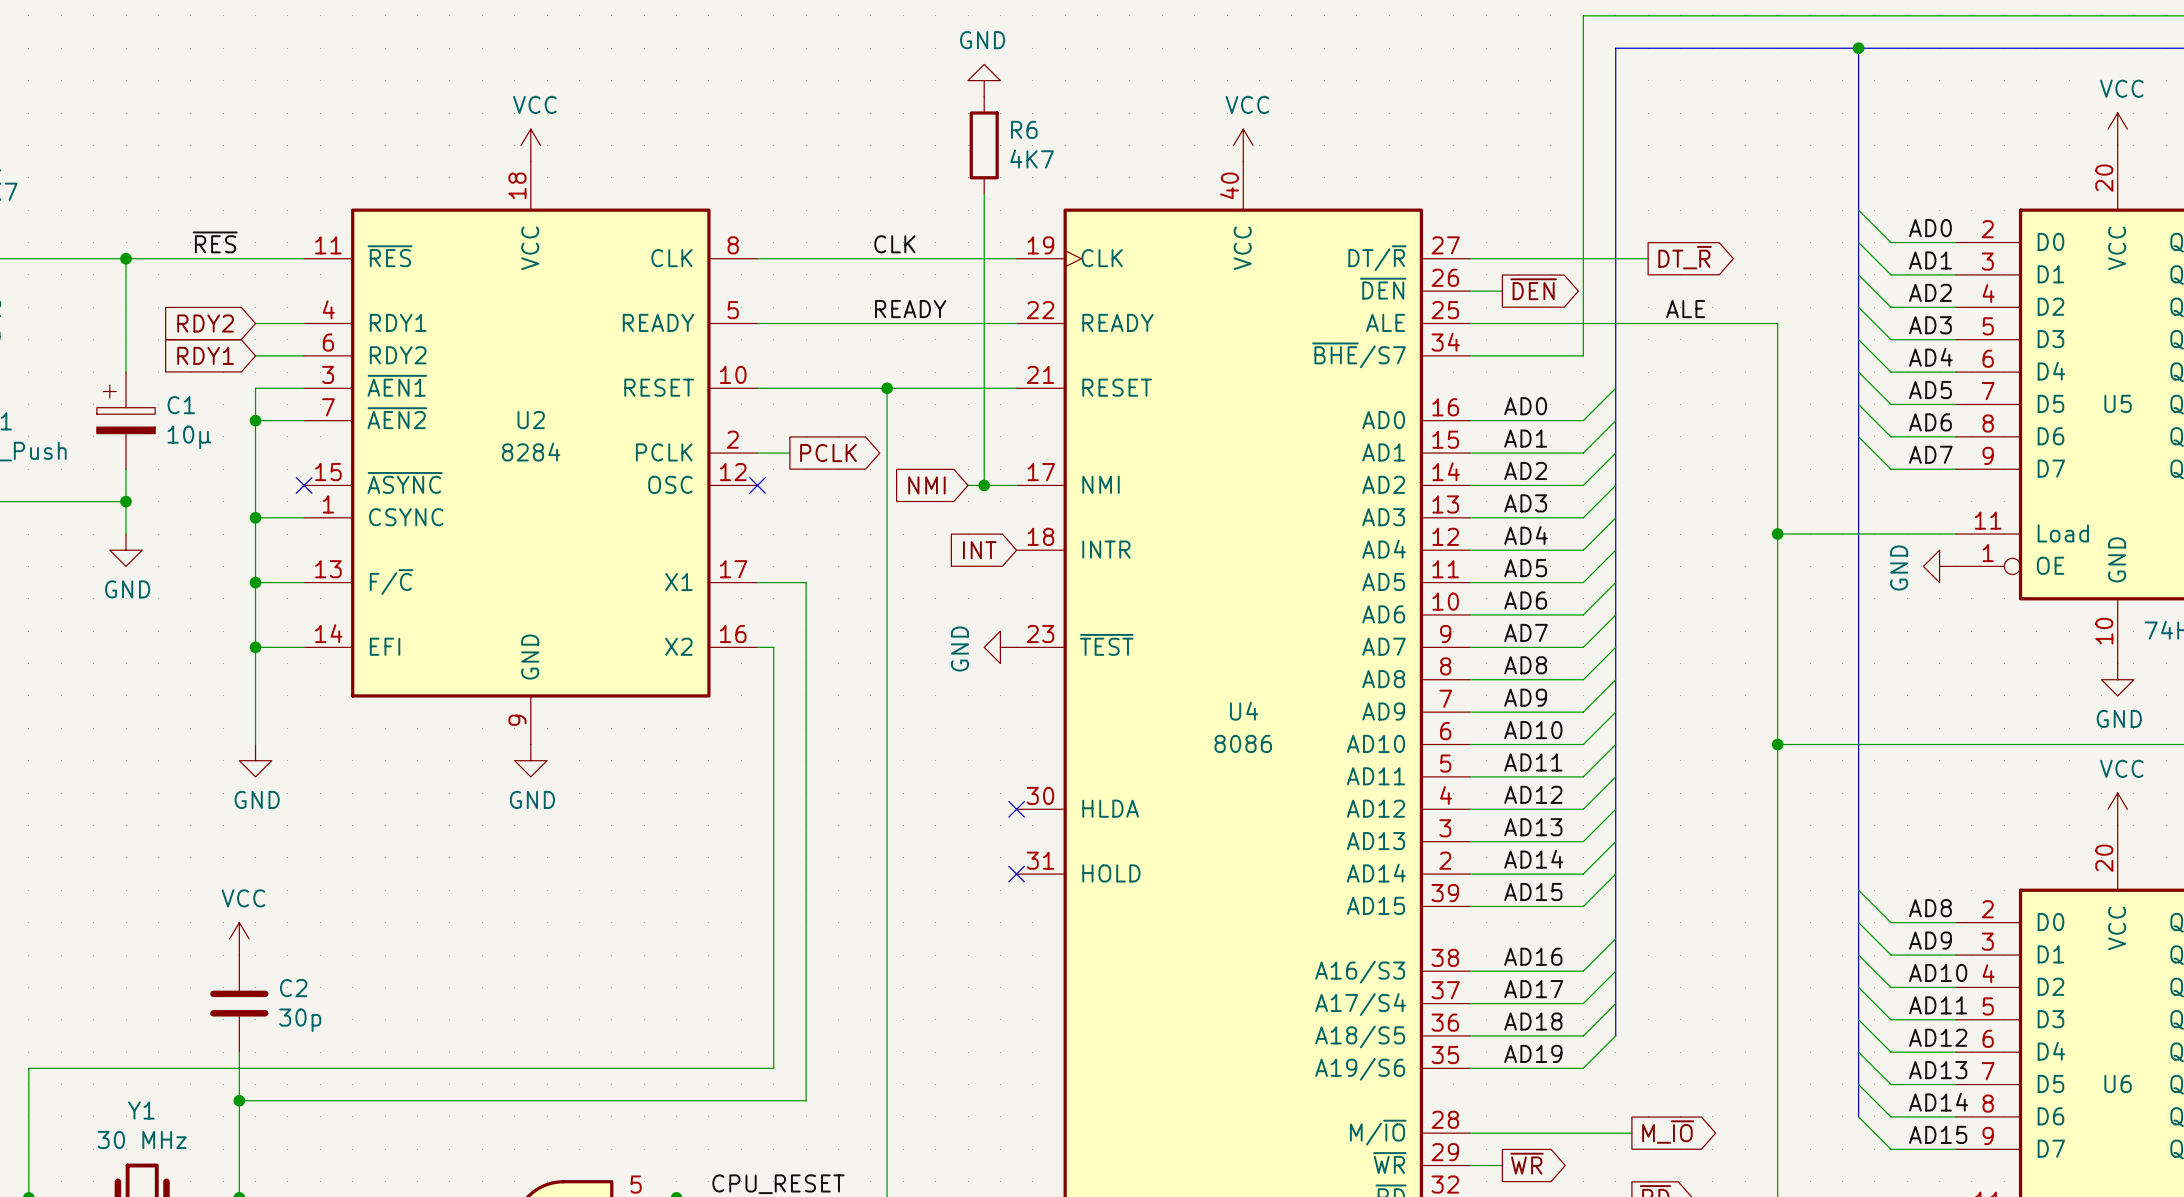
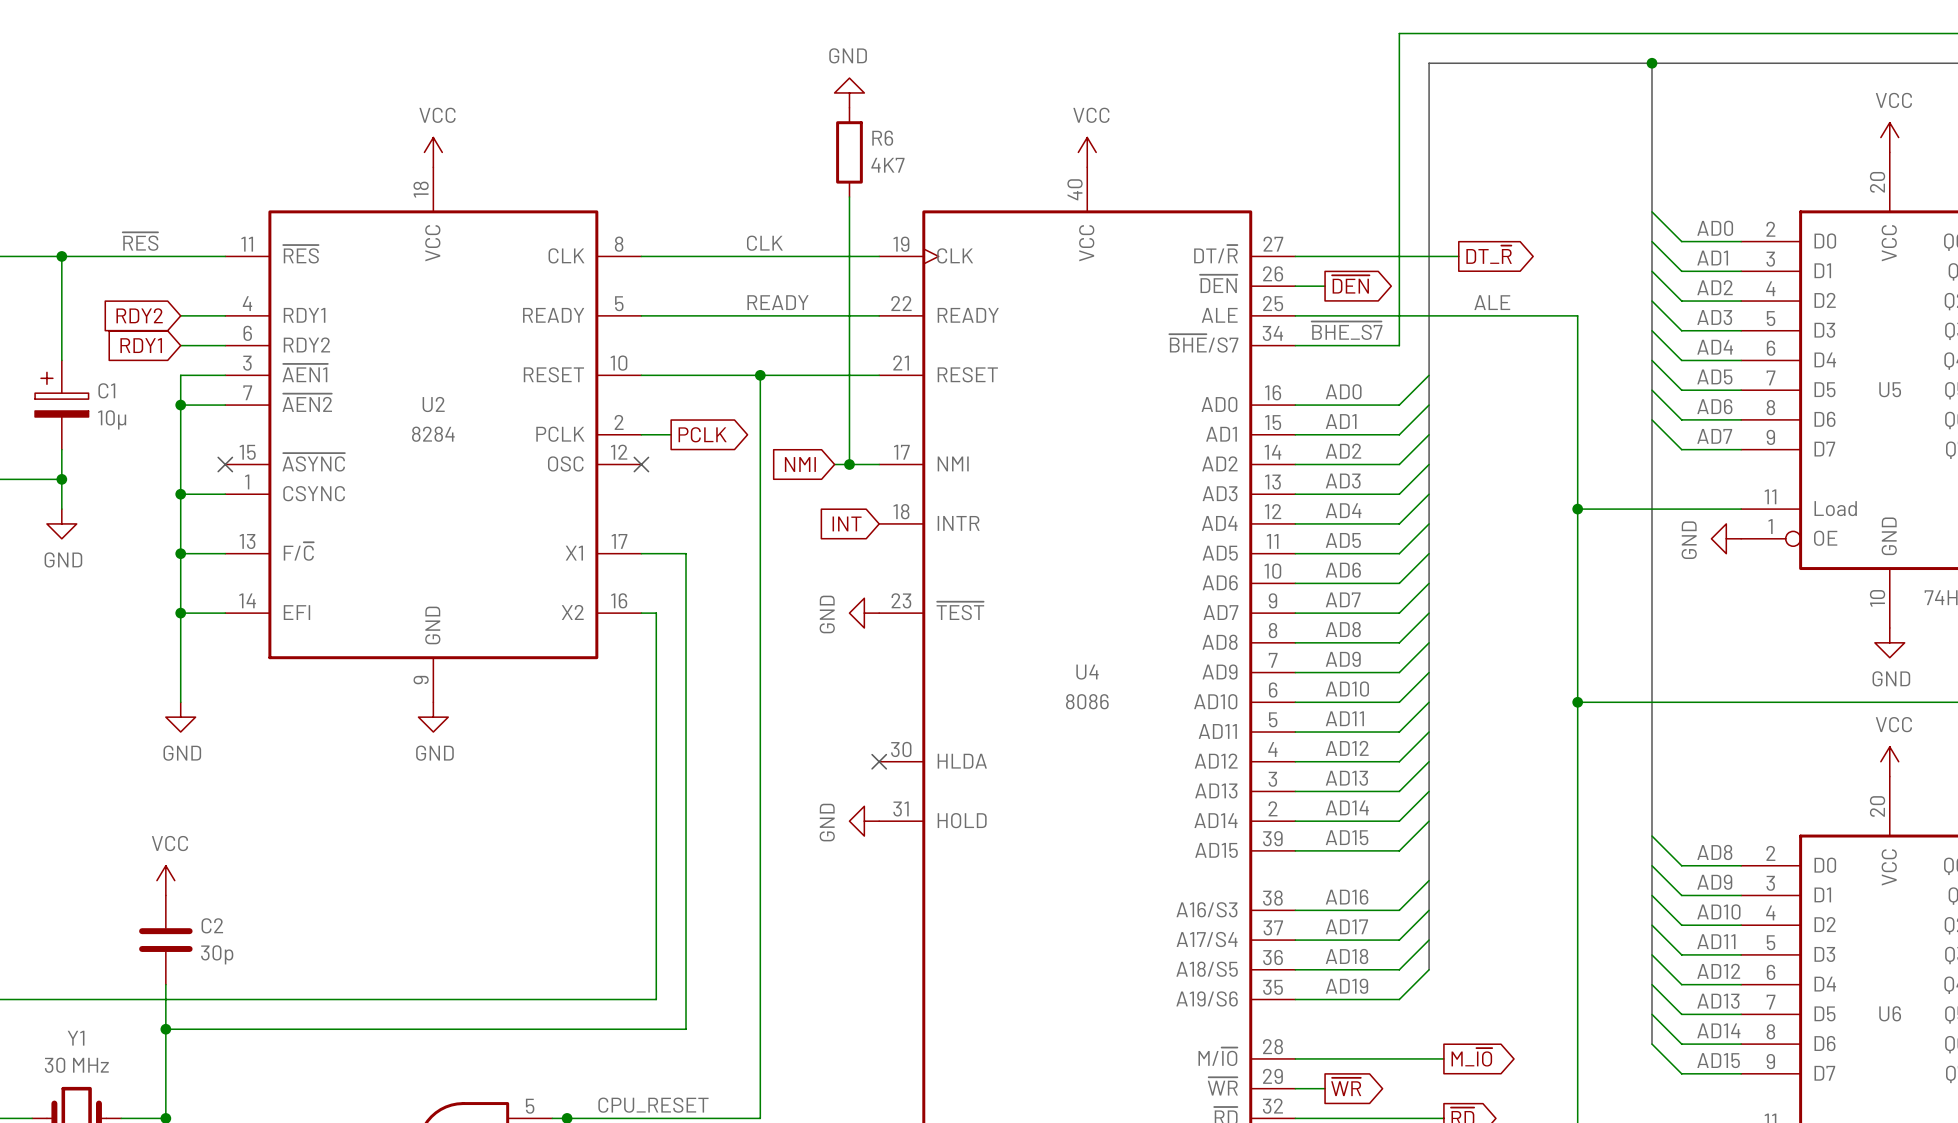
label: none -> ~{BHE_S7} (1347, 330)
power symbol: none -> GND (864, 821)
no-connect mark: (1016, 874) -> none

